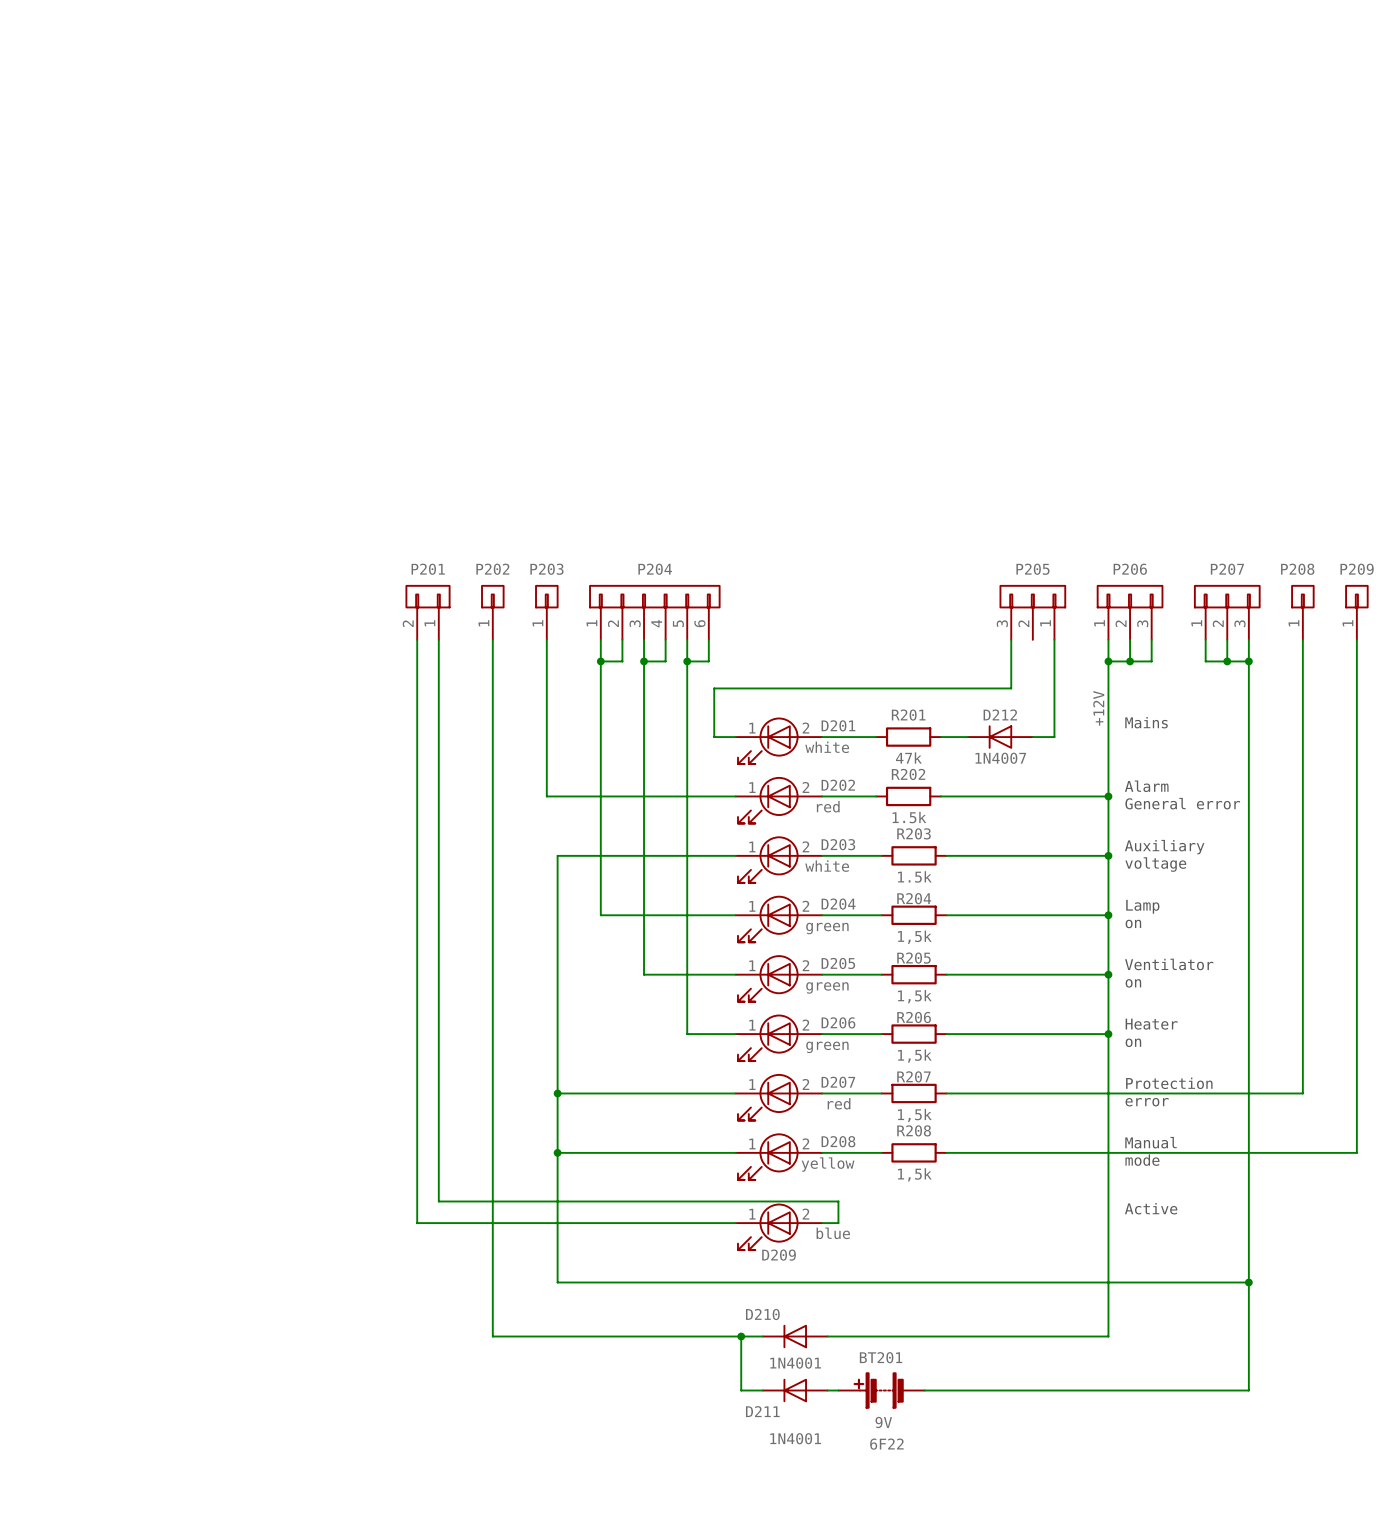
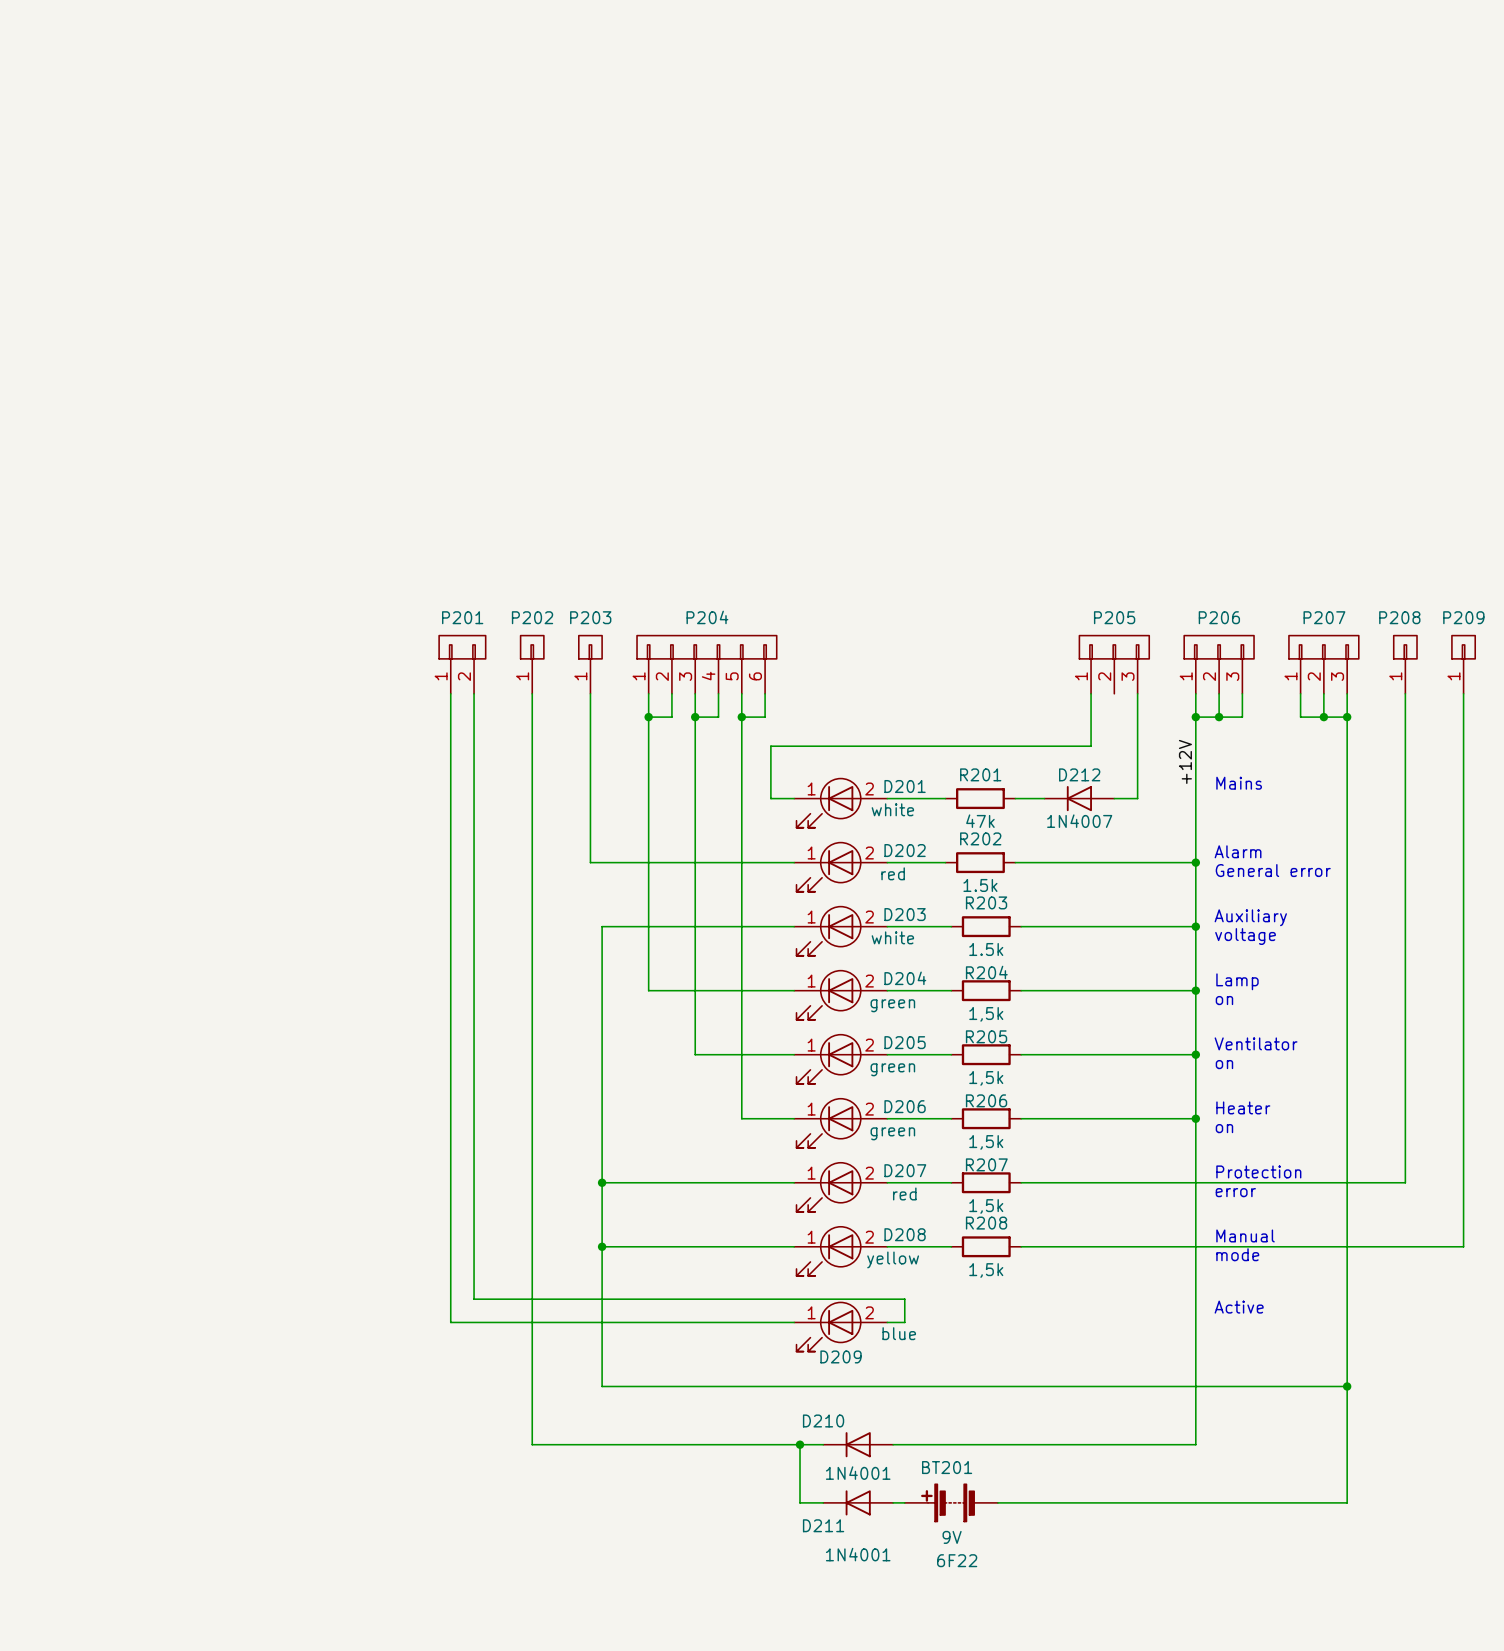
P201 flip: as is (428, 596) -> left-right (462, 647)
P205 flip: as is (1032, 596) -> left-right (1114, 647)

